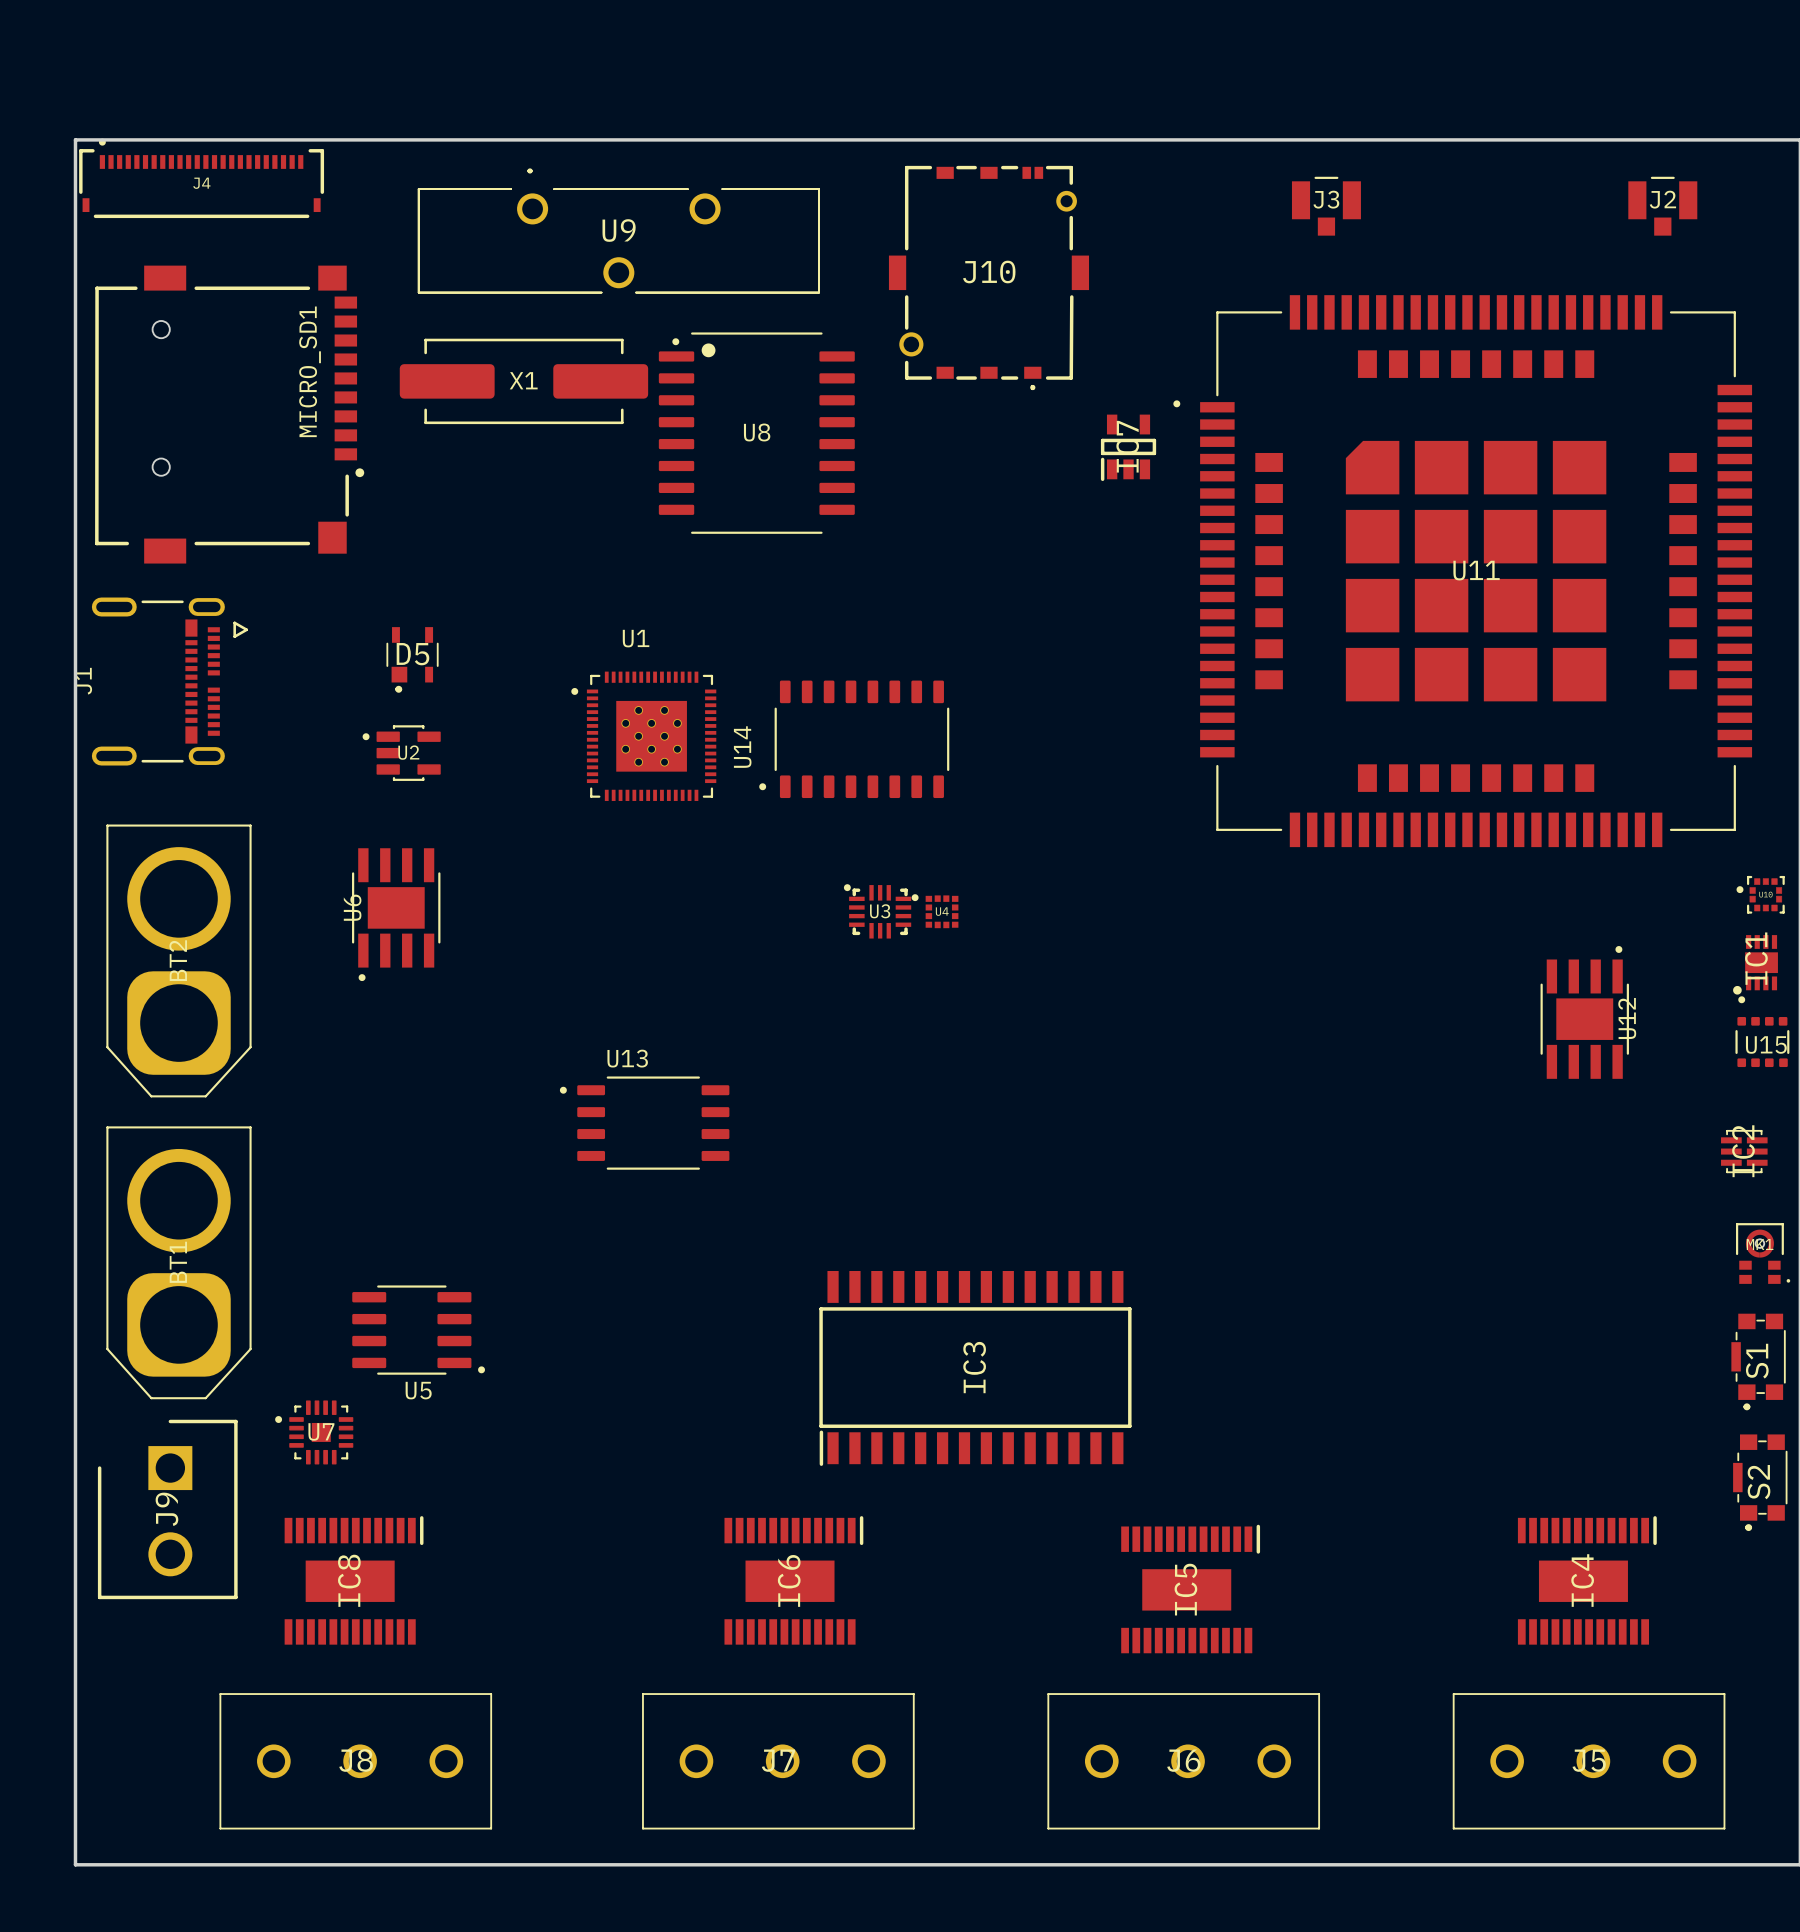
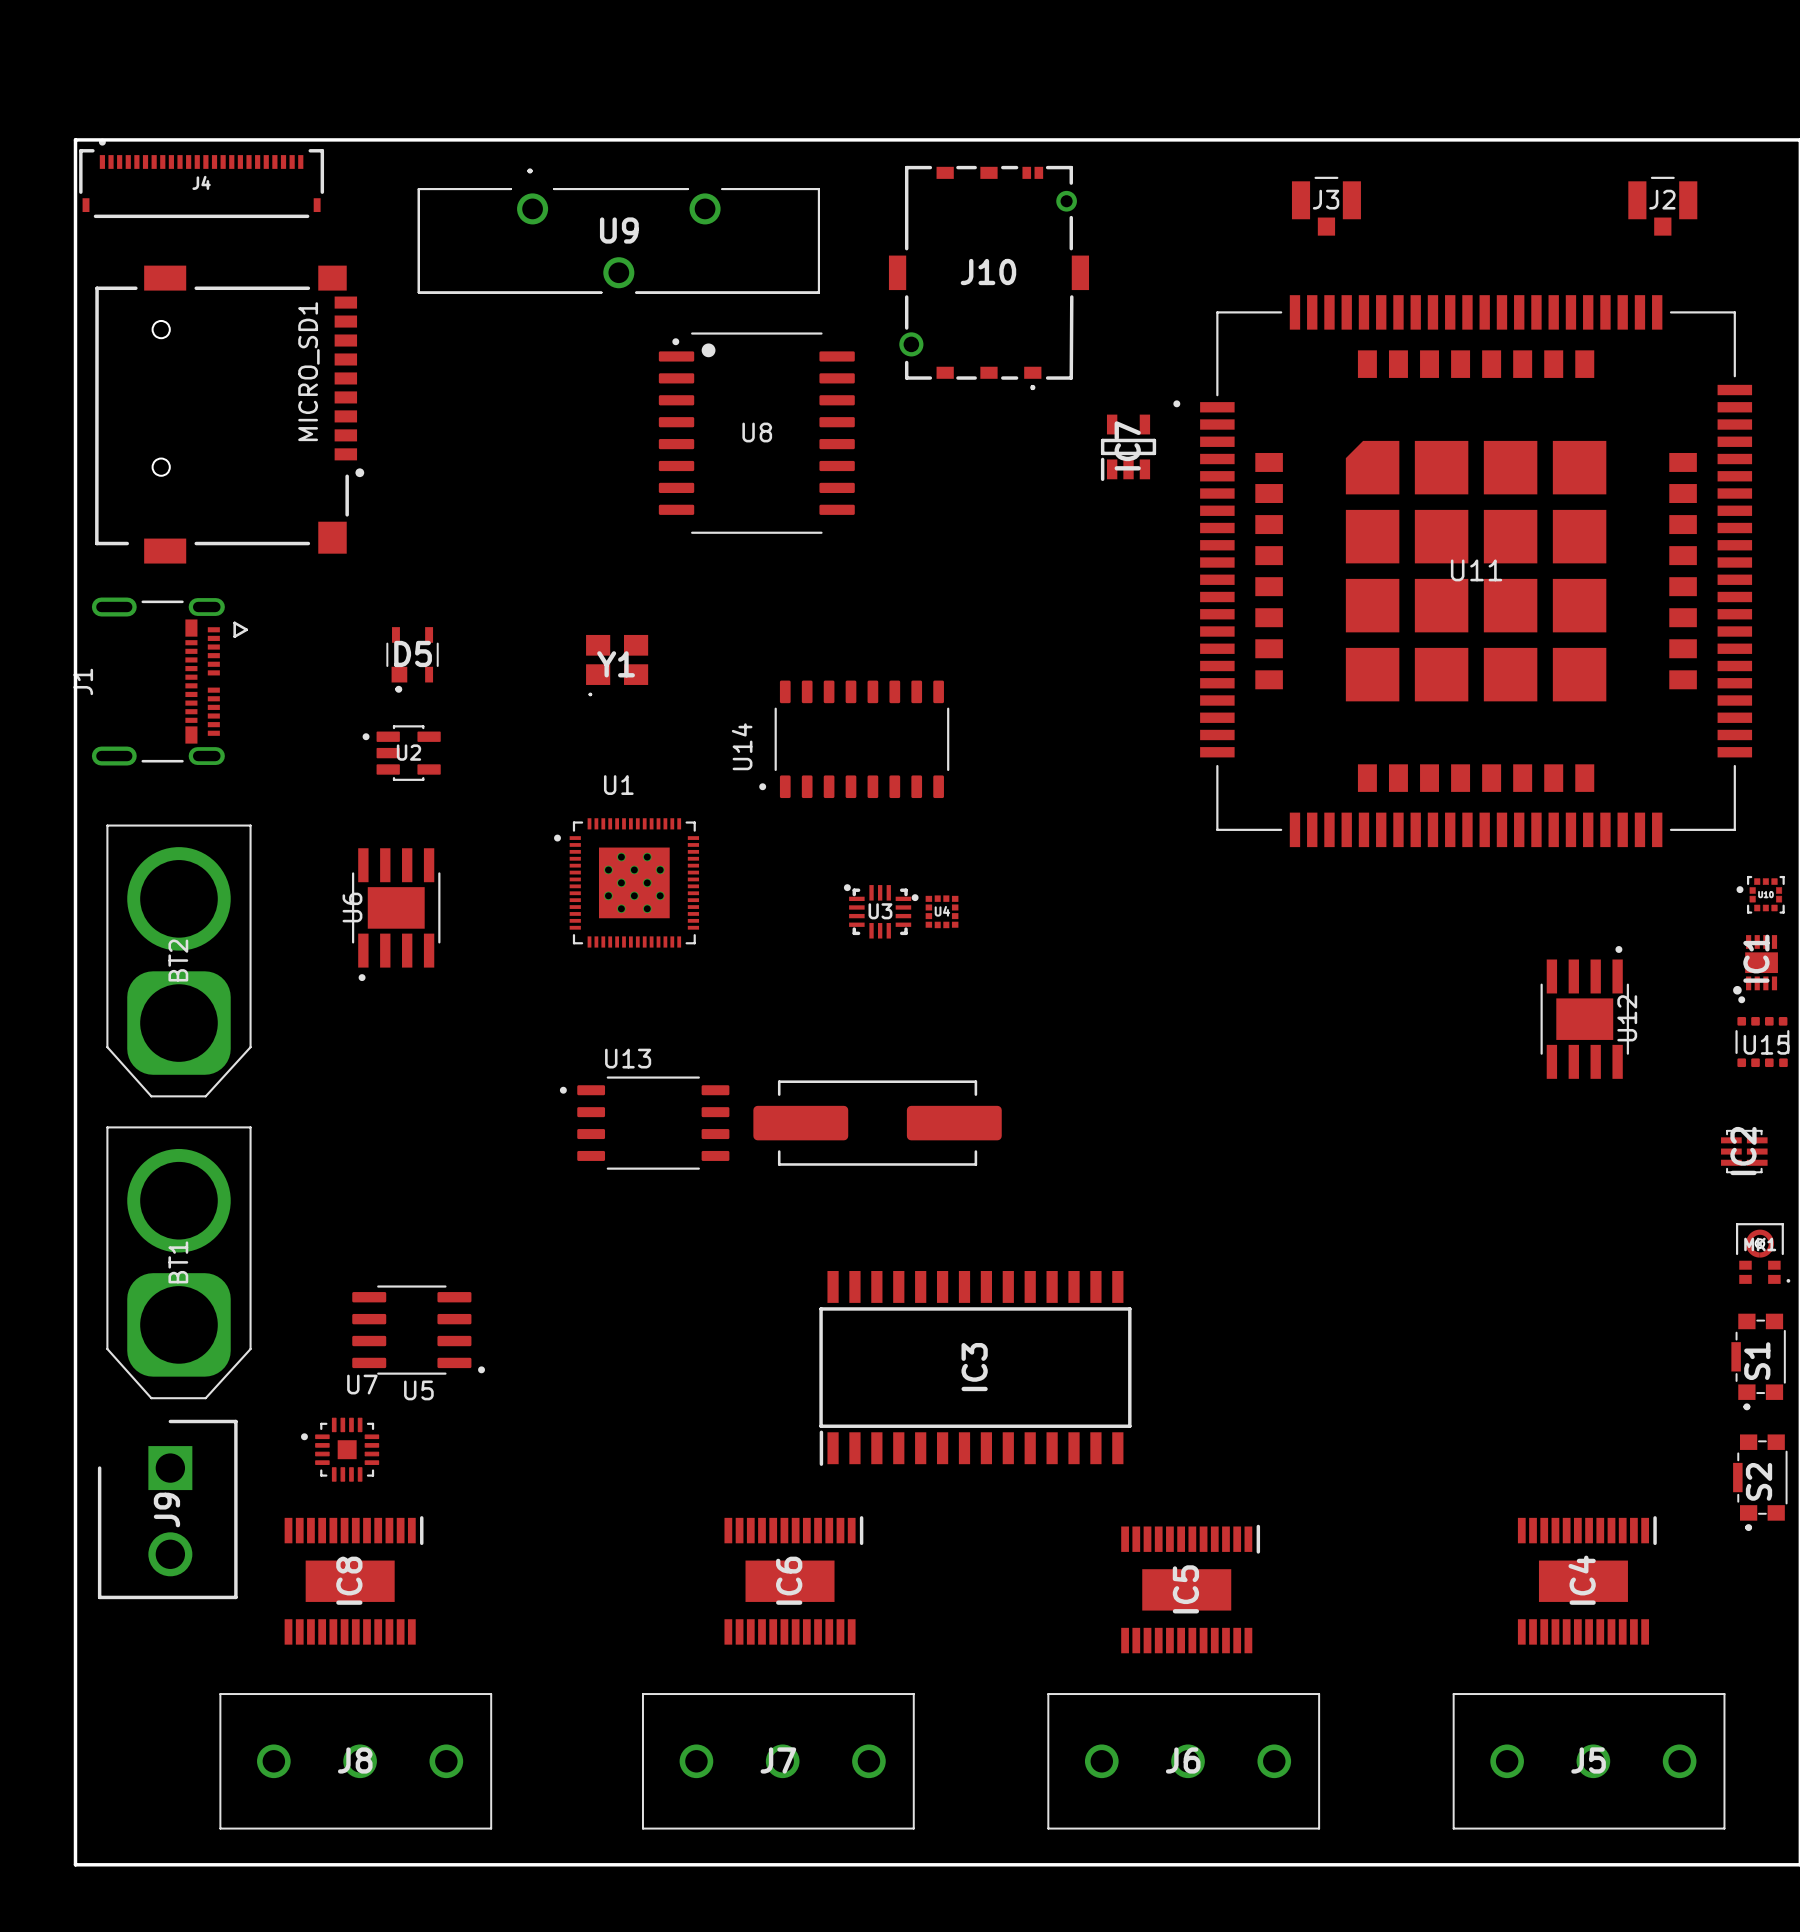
X1: (523, 381) -> none
Y1: none -> (617, 665)
U1 position: (643, 736) -> (626, 882)
part: none -> (877, 1123)
U7 name position: U7 (321, 1431) -> U7 (362, 1384)
U7 position: (314, 1432) -> (340, 1449)

